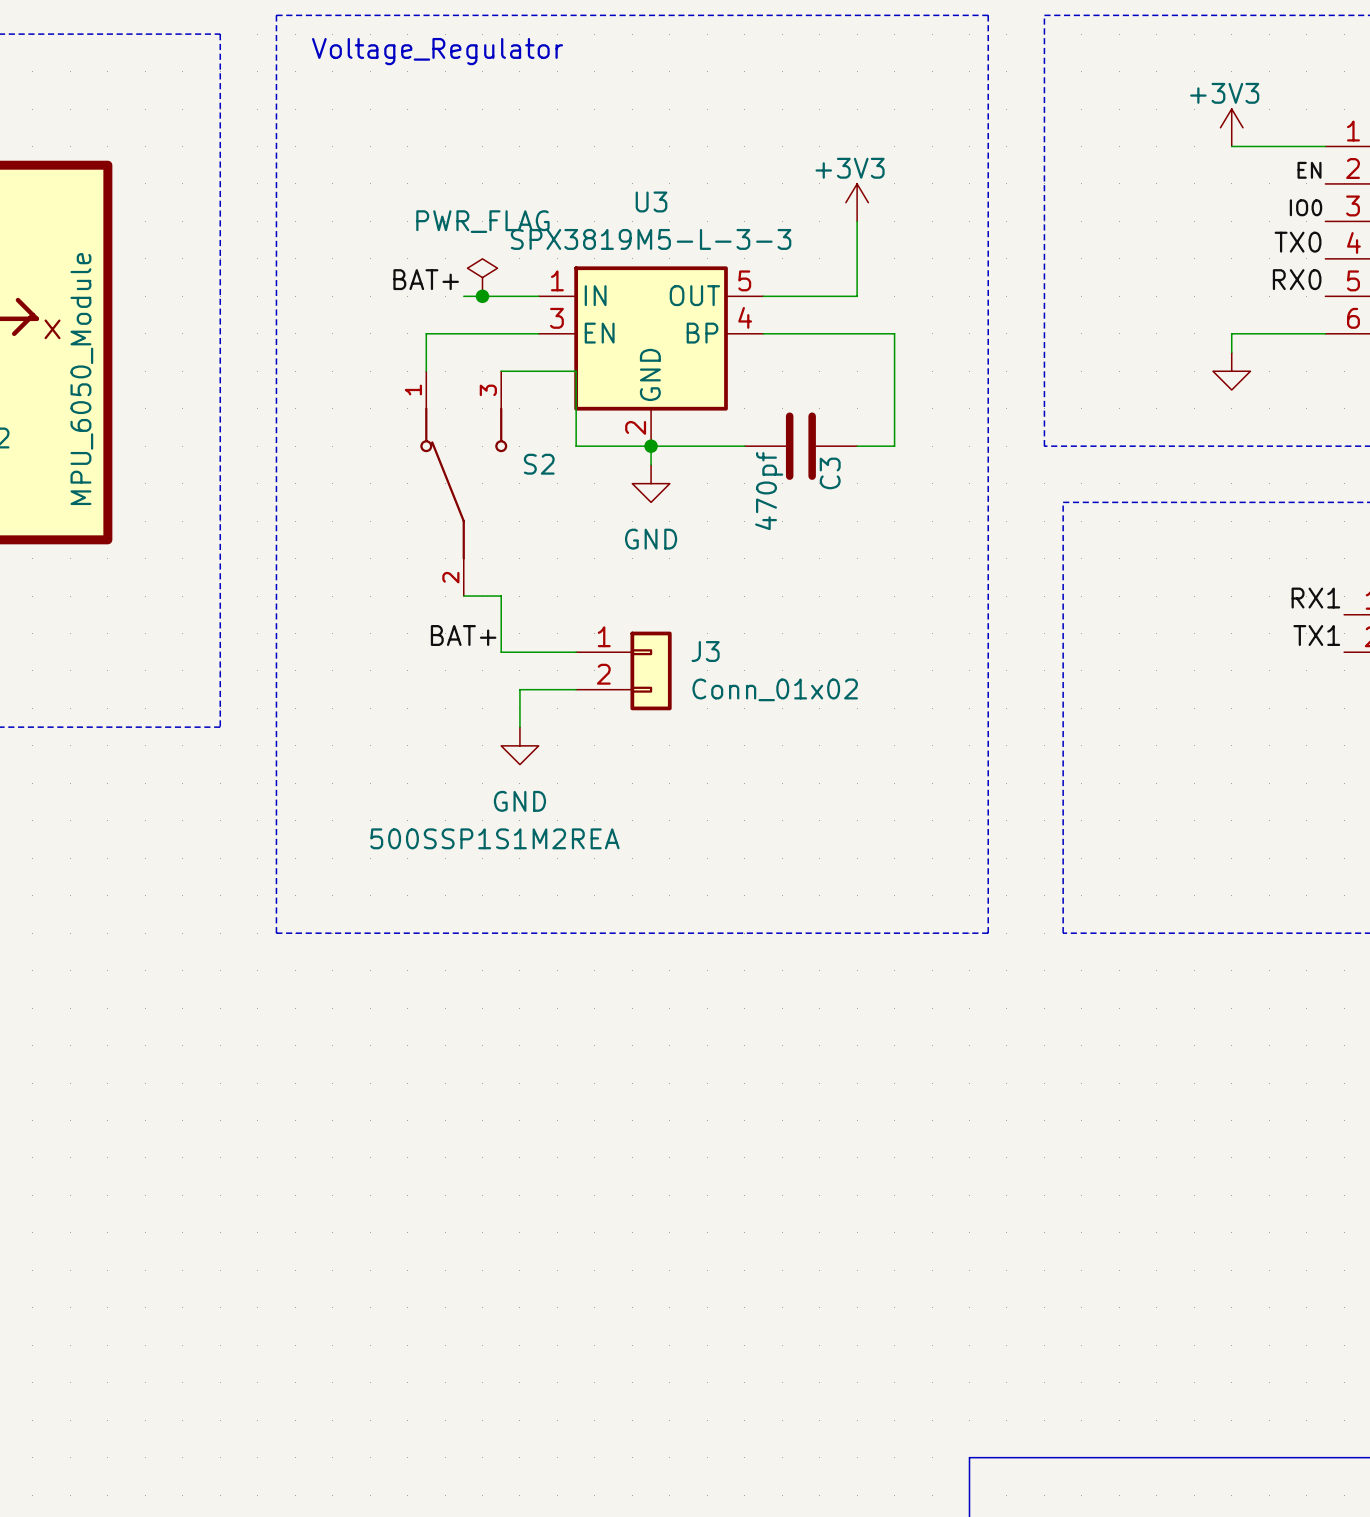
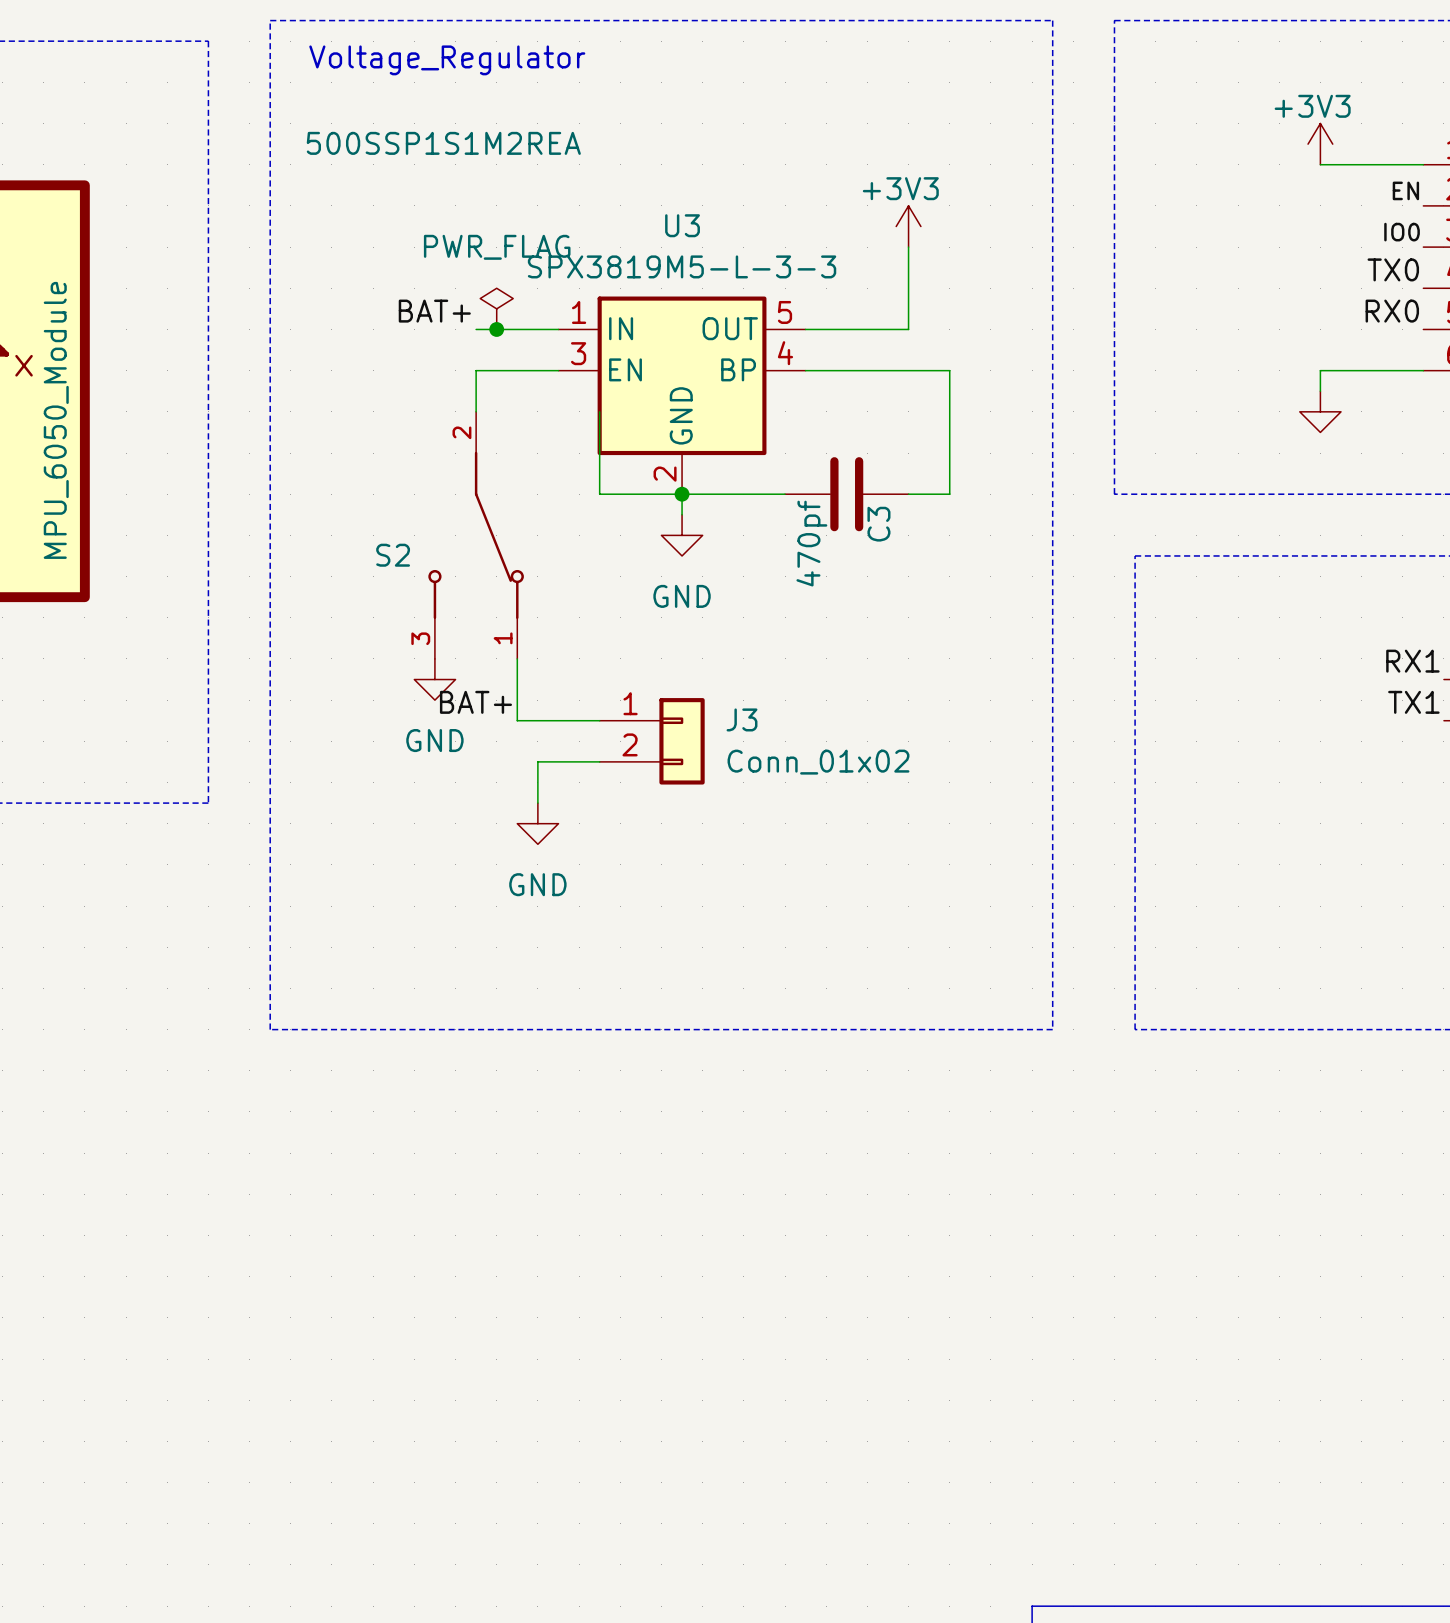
wire: (463, 333) (426, 333) (426, 371) -> (476, 370) (476, 411)
wire: (501, 371) (576, 371) -> none
S2 rotation: 0° (463, 483) -> 180° (476, 535)
wire: (463, 596) (501, 596) -> none
power symbol: none -> GND (434, 679)

